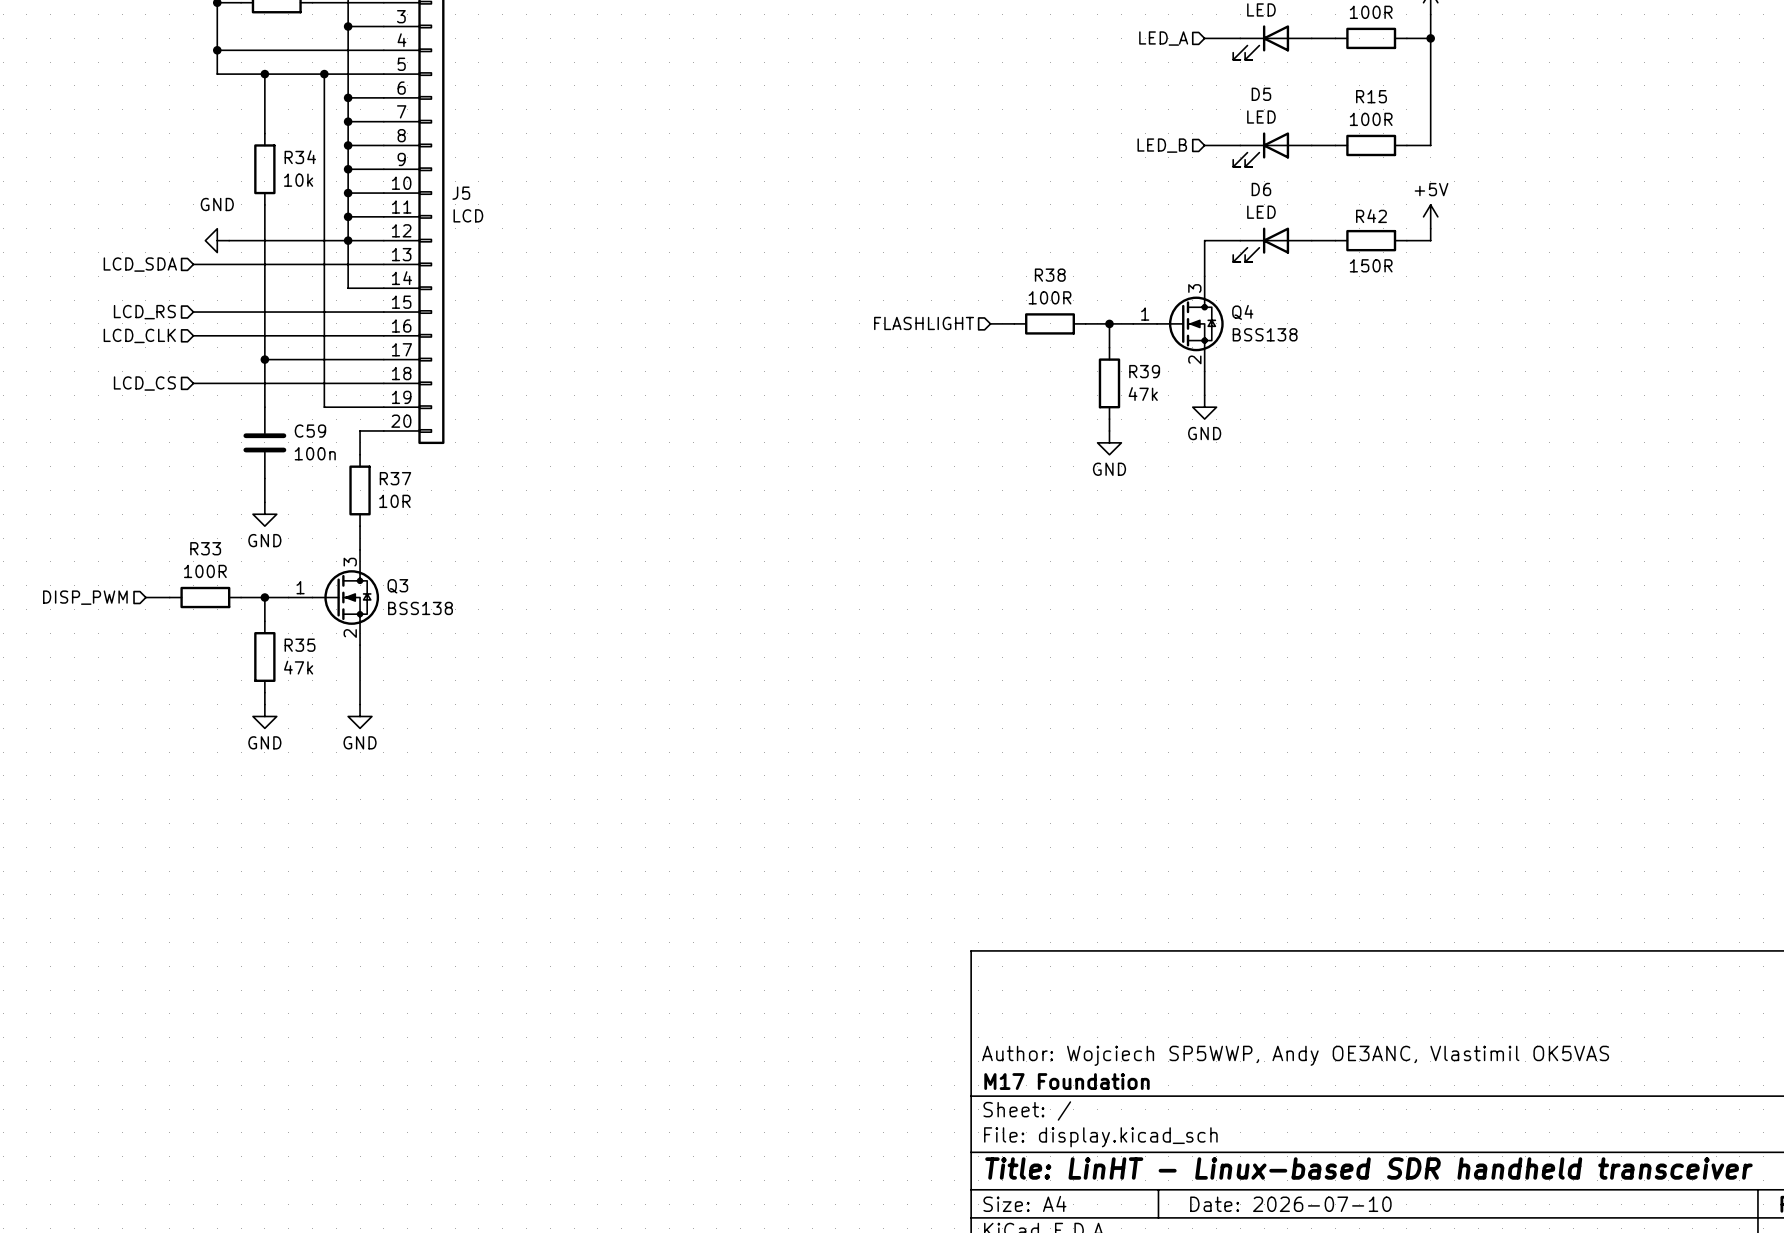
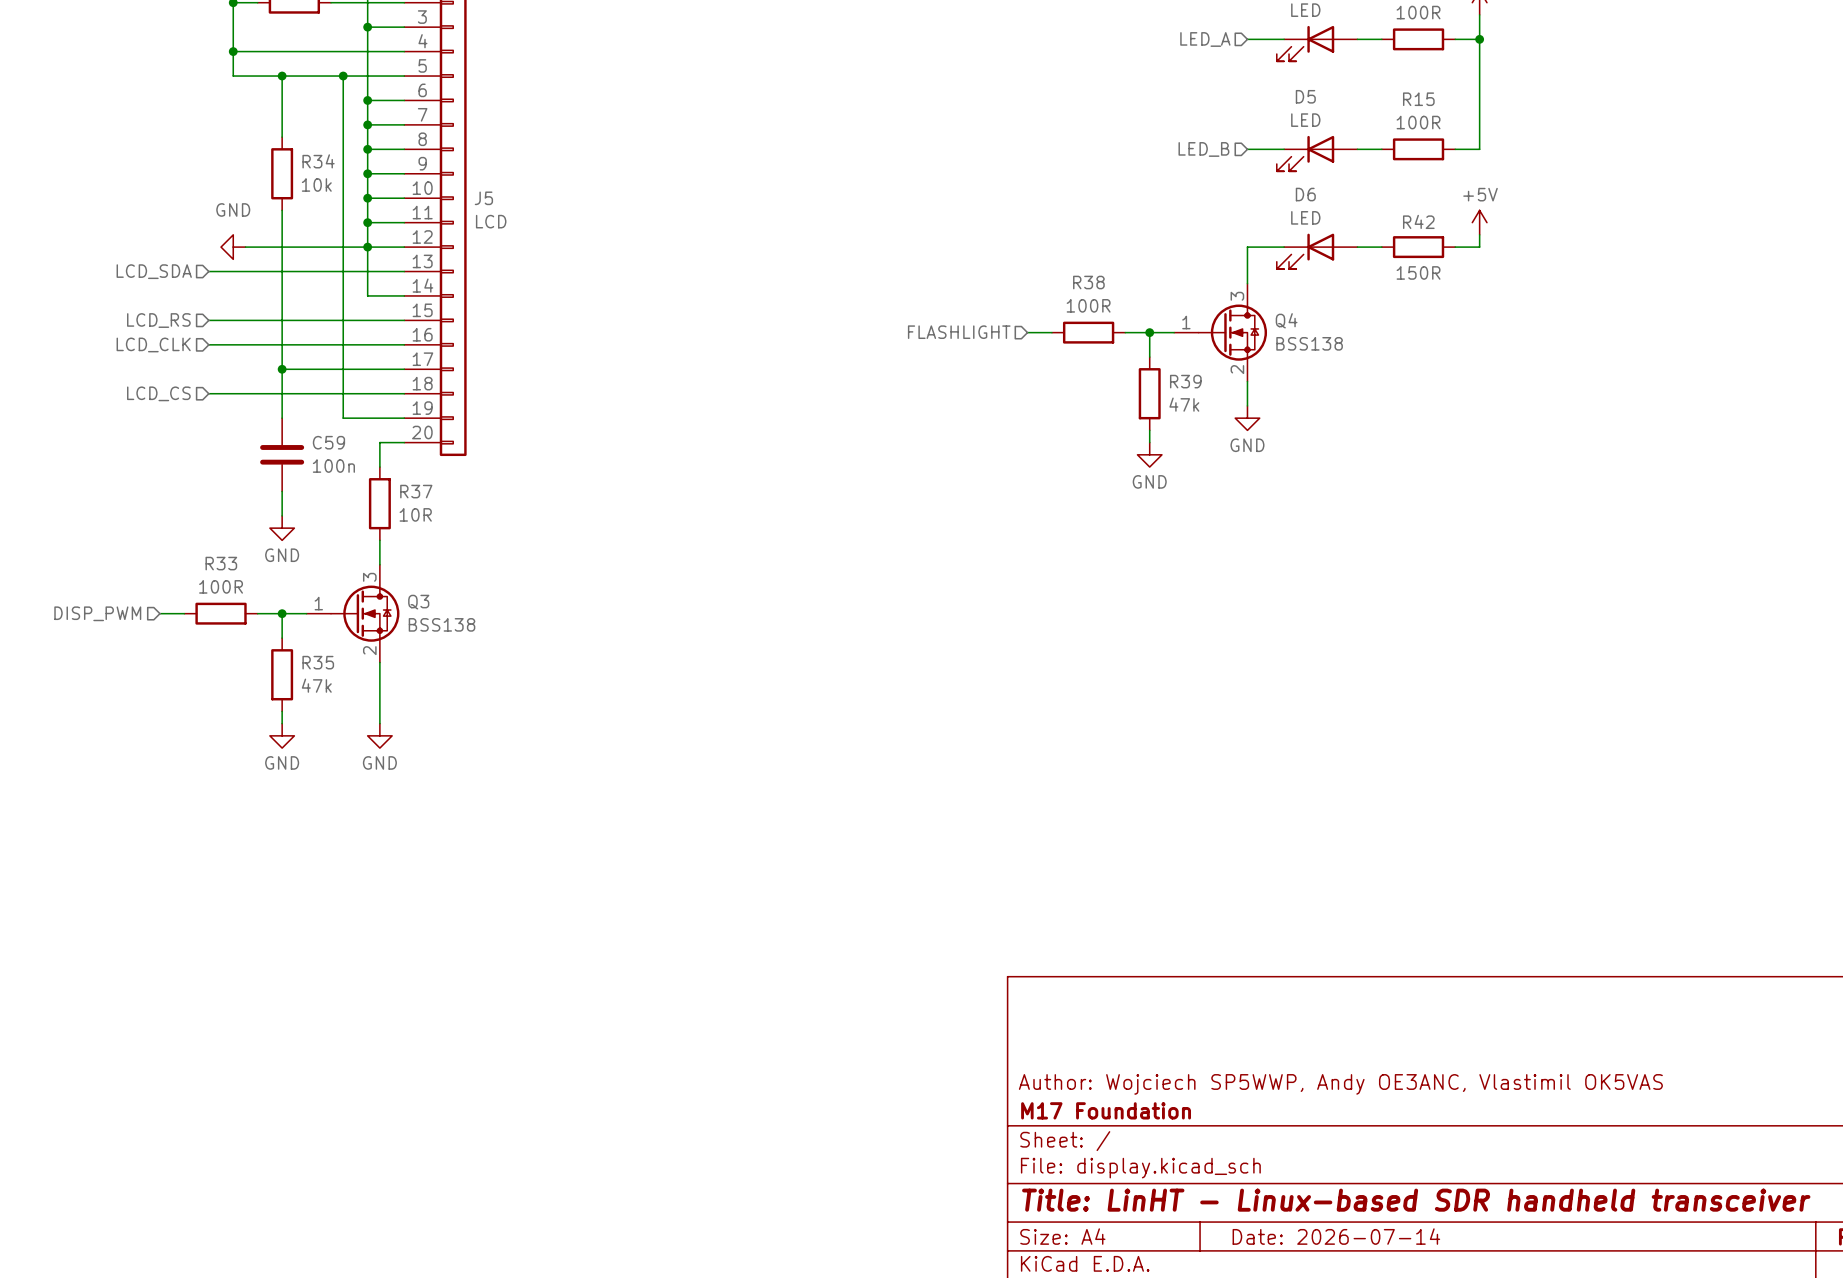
title block: Date: 2026-07-10 (1290, 1204) -> Date: 2026-07-14 (1336, 1236)

